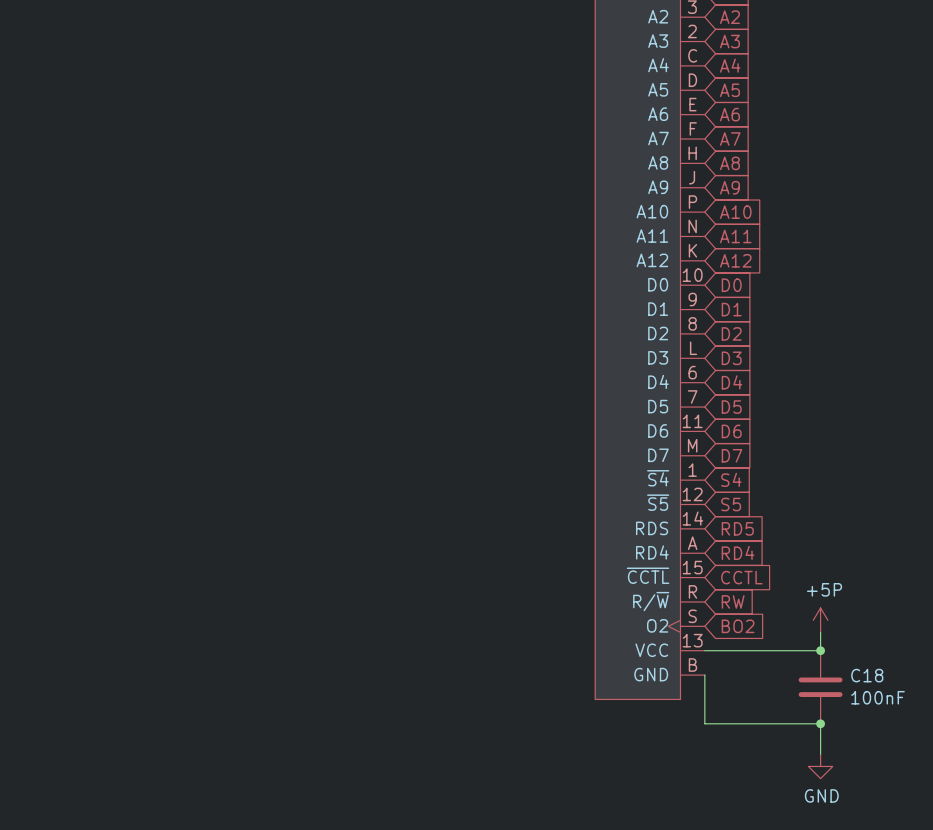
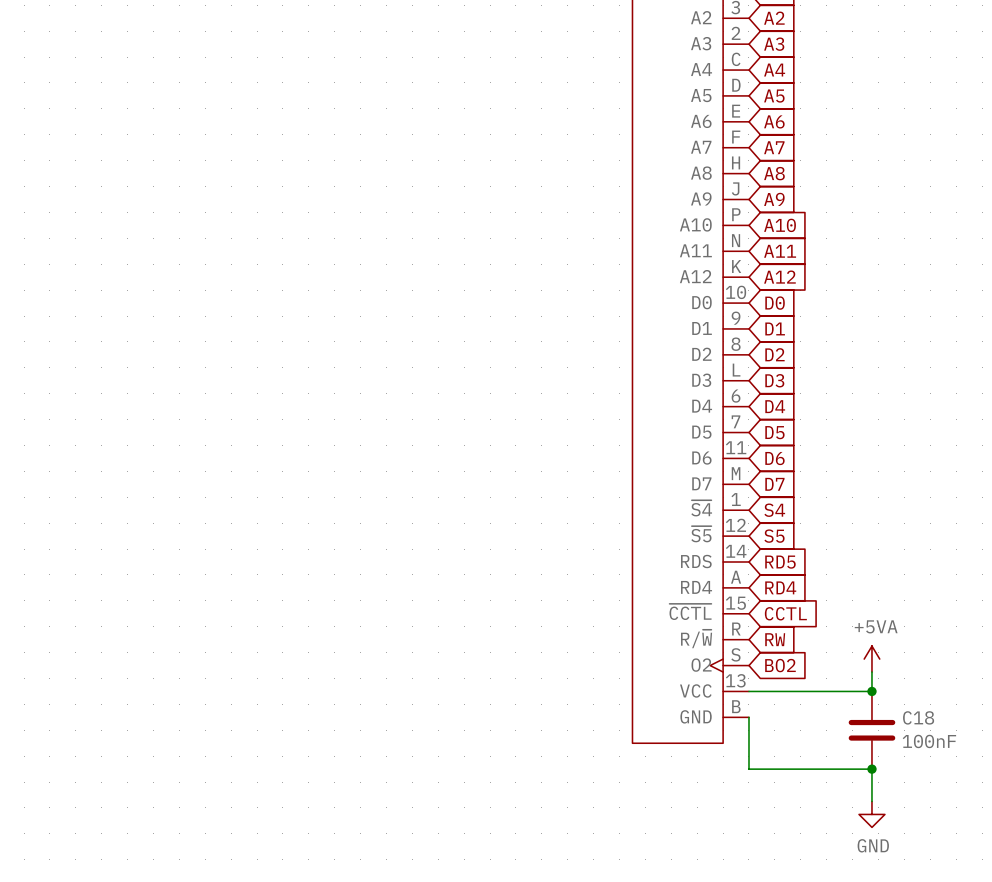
power symbol: +5P (820, 620) -> +5VA (871, 659)

